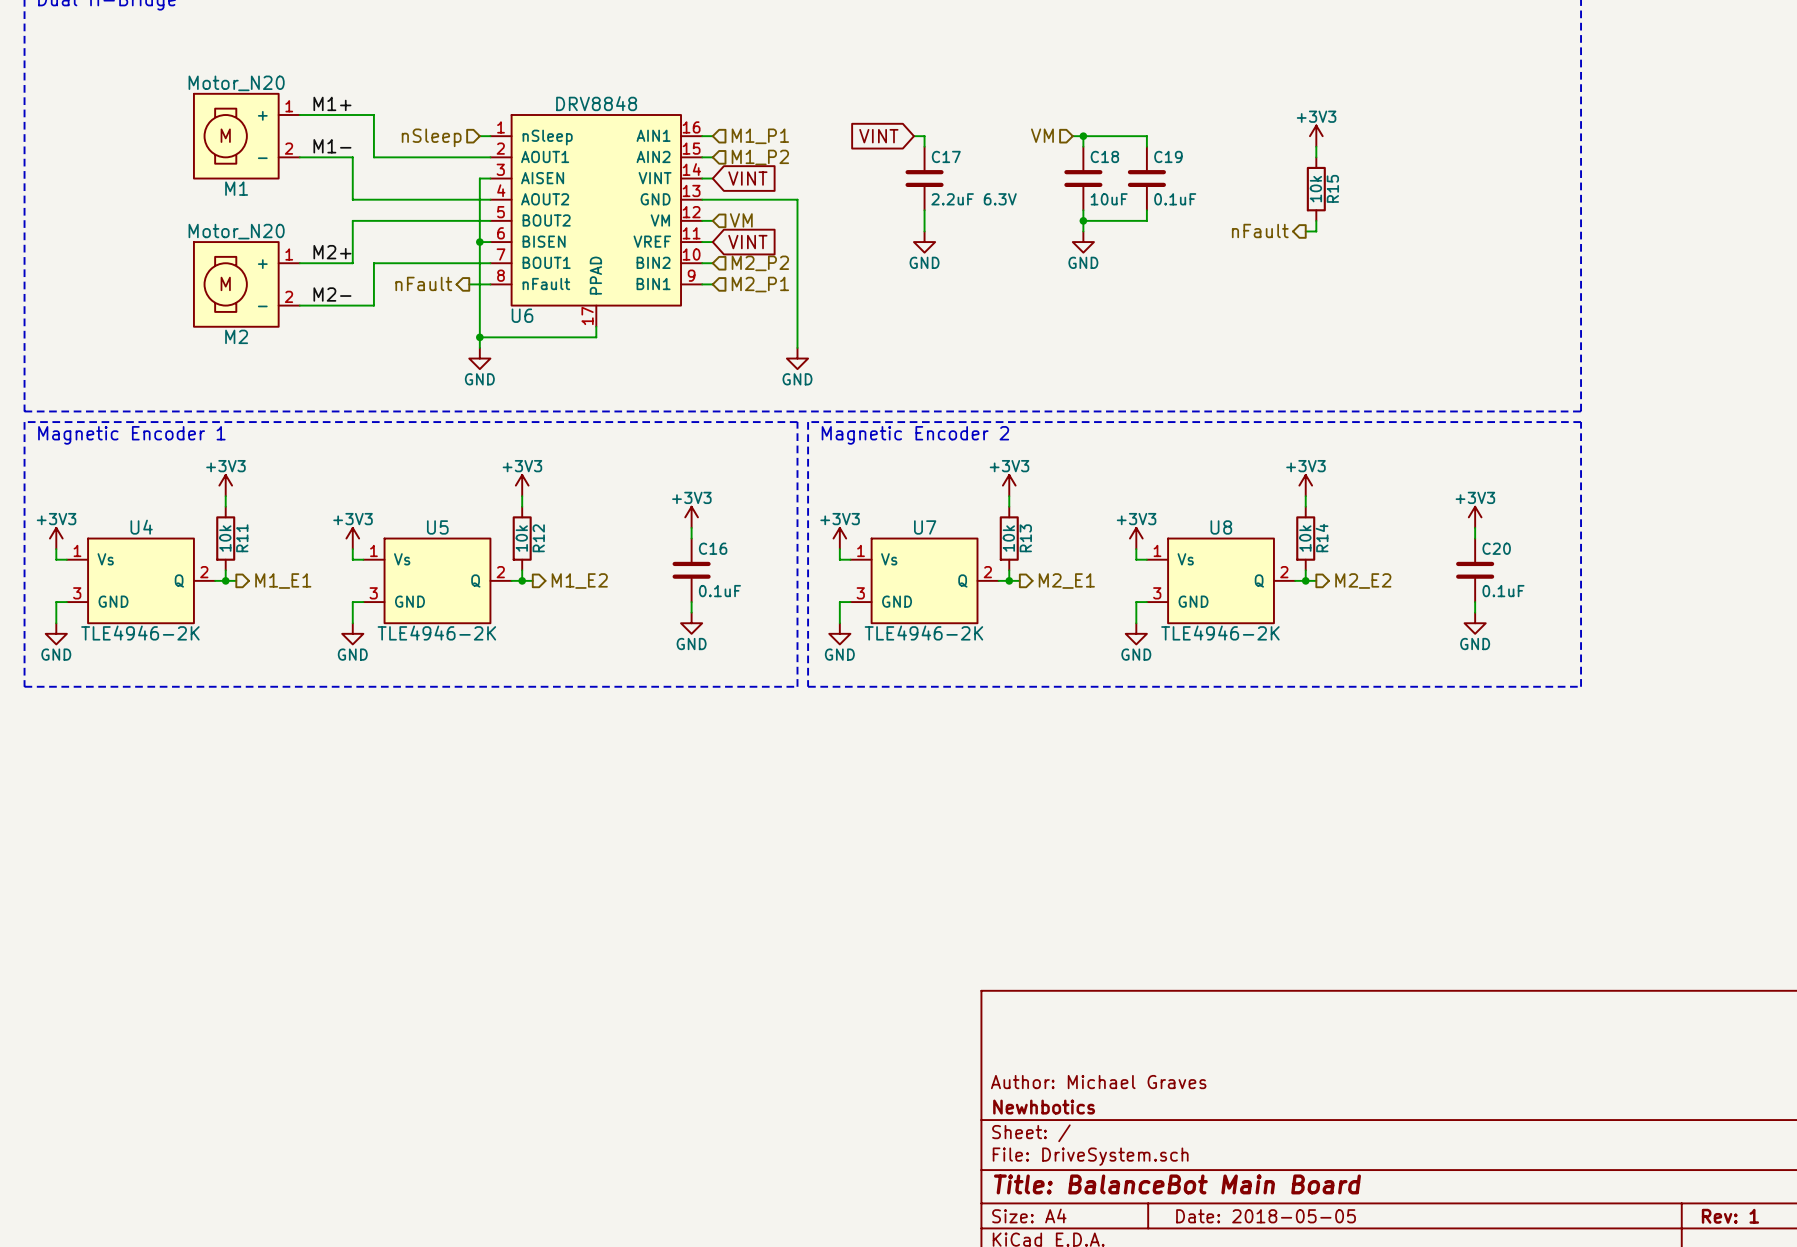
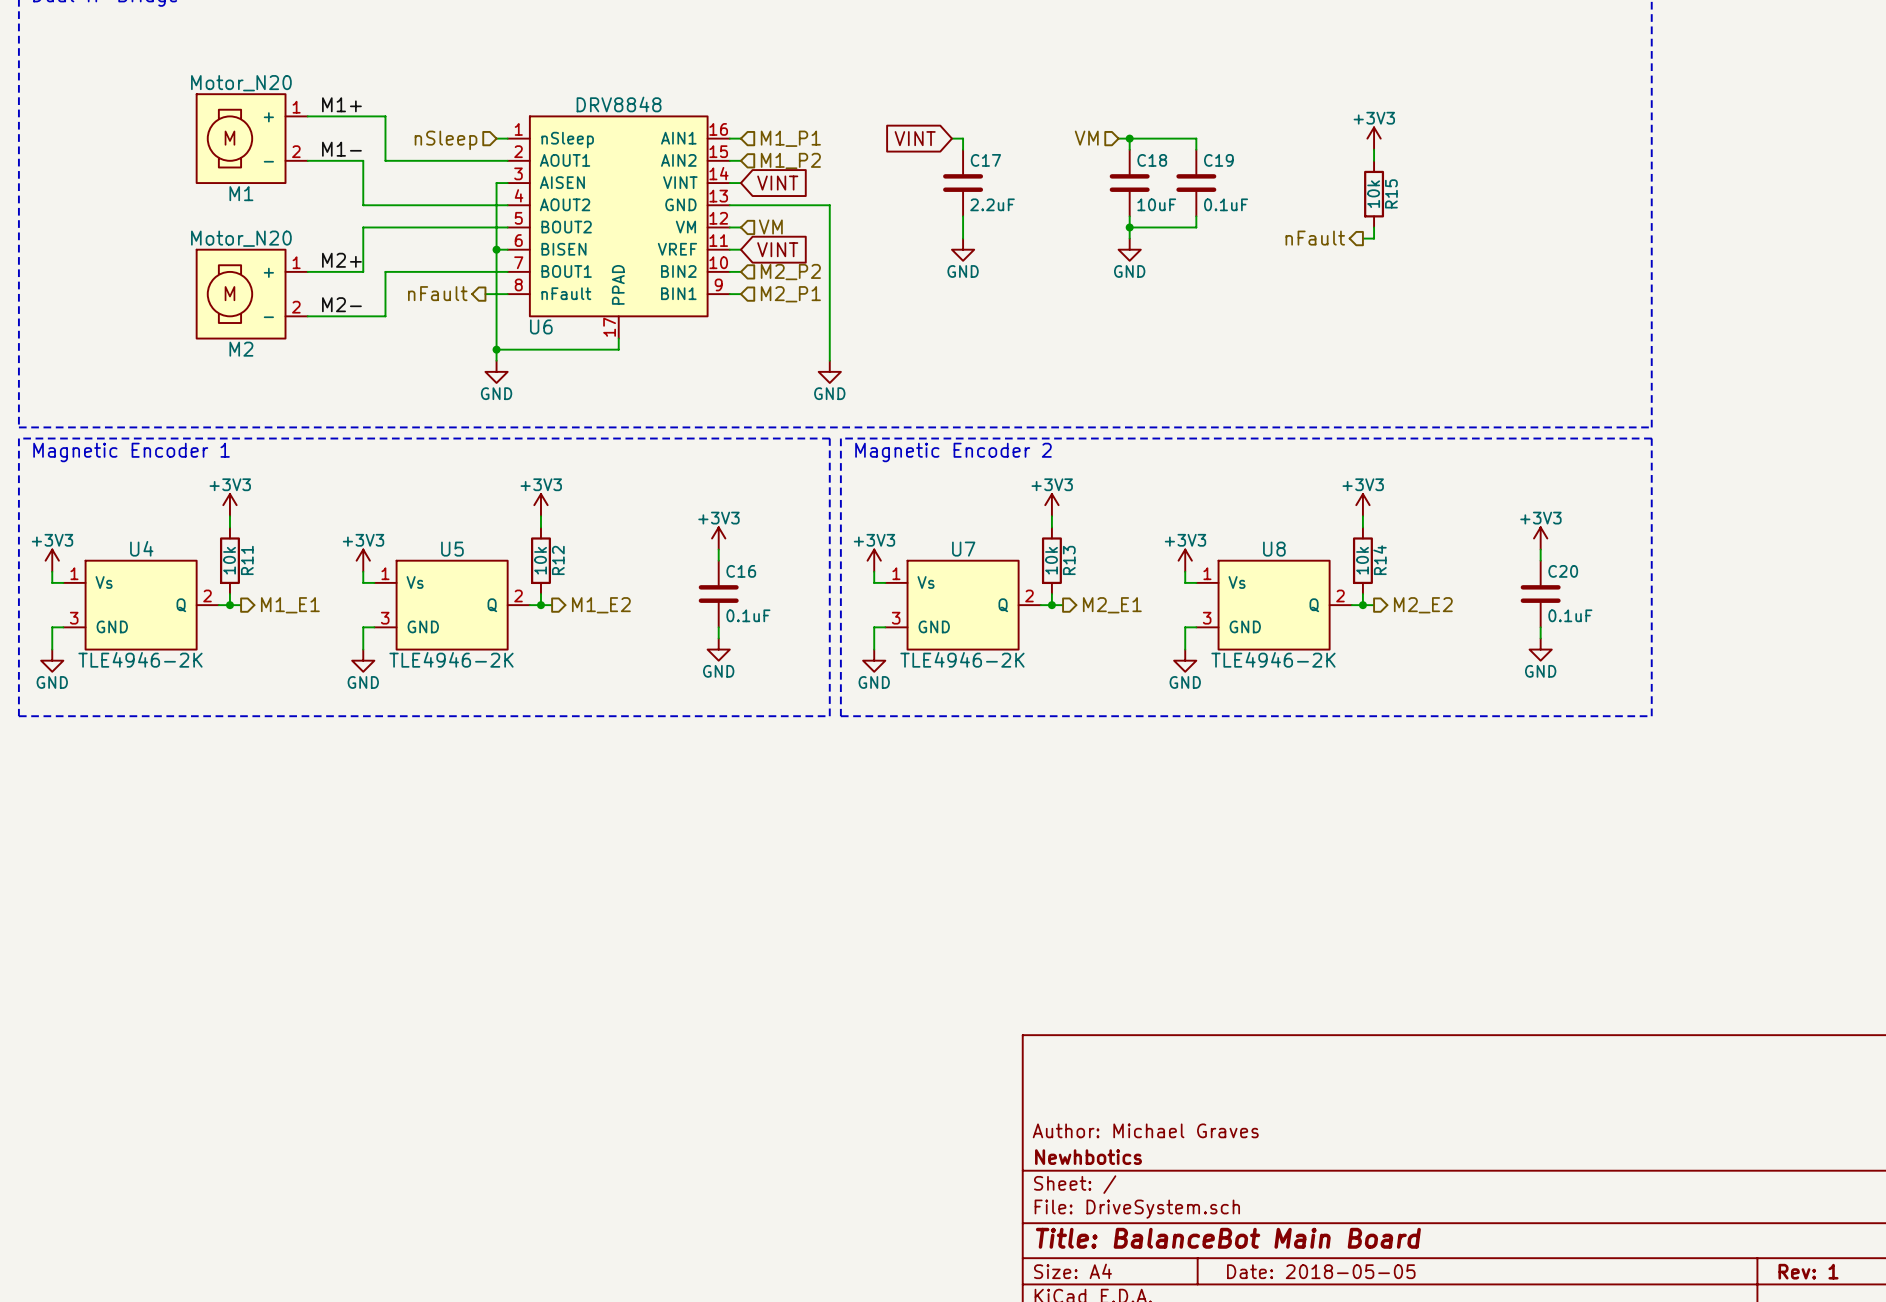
C17 value: 2.2uF 6.3V (974, 199) -> 2.2uF (992, 204)

